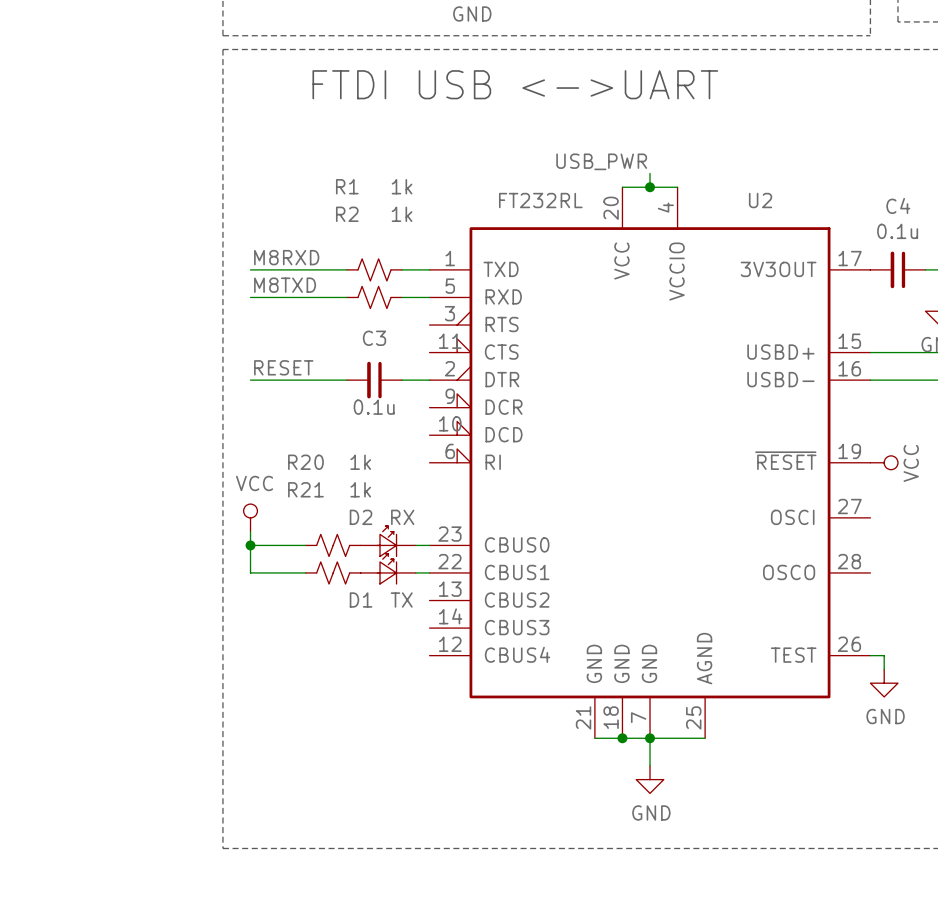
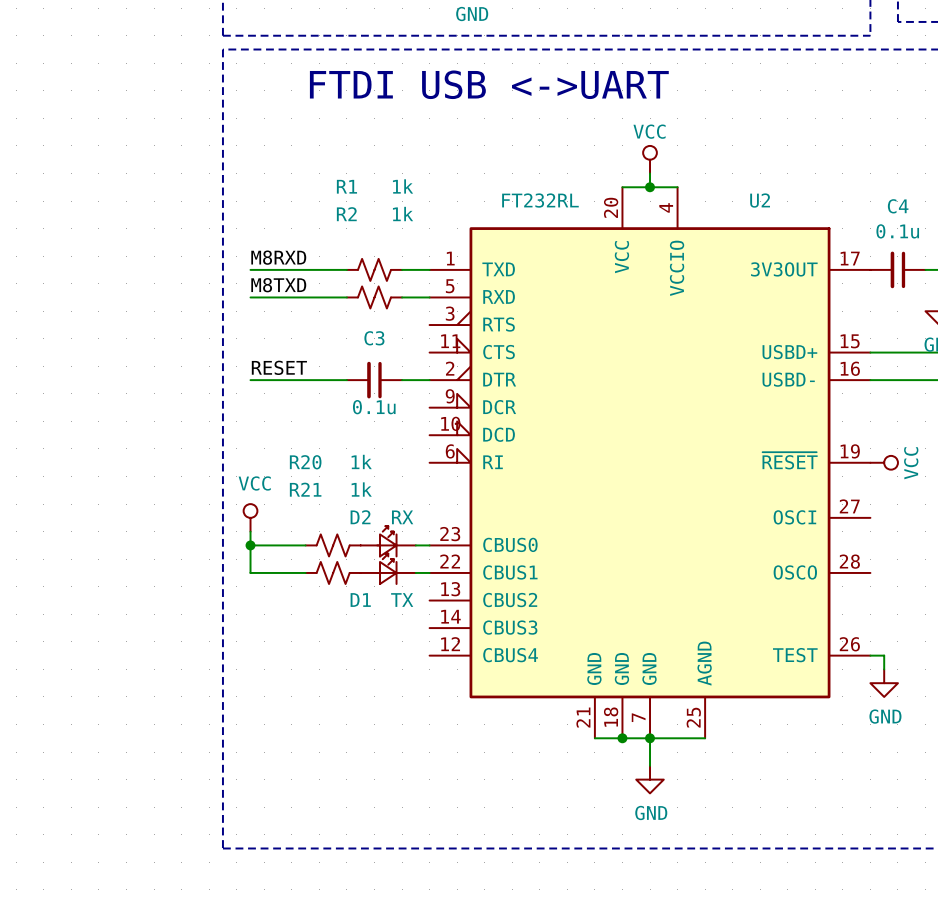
power symbol: none -> VCC (650, 159)
label: USB_PWR (601, 161) -> none

